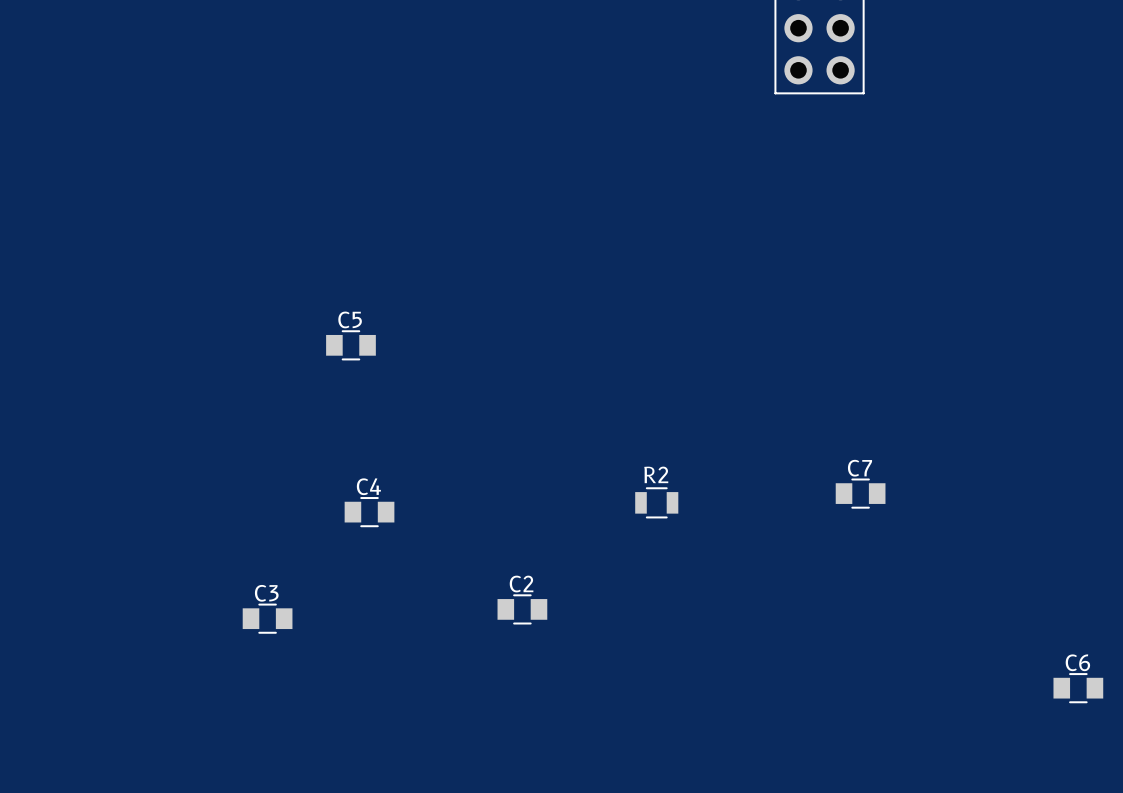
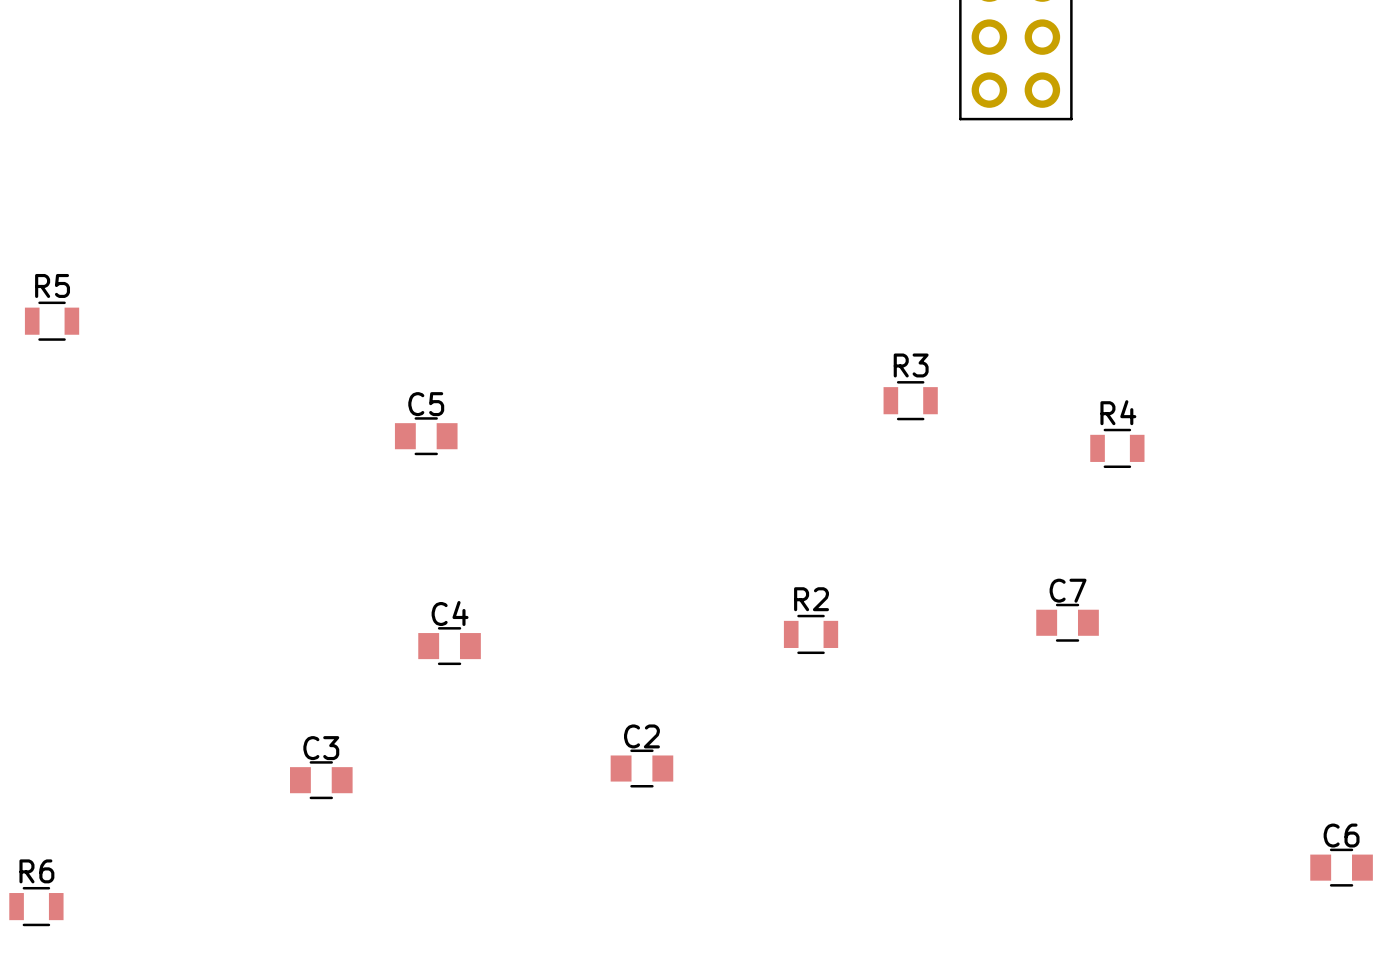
R5: none -> (52, 321)
R3: none -> (910, 400)
R4: none -> (1117, 448)
R6: none -> (36, 906)

